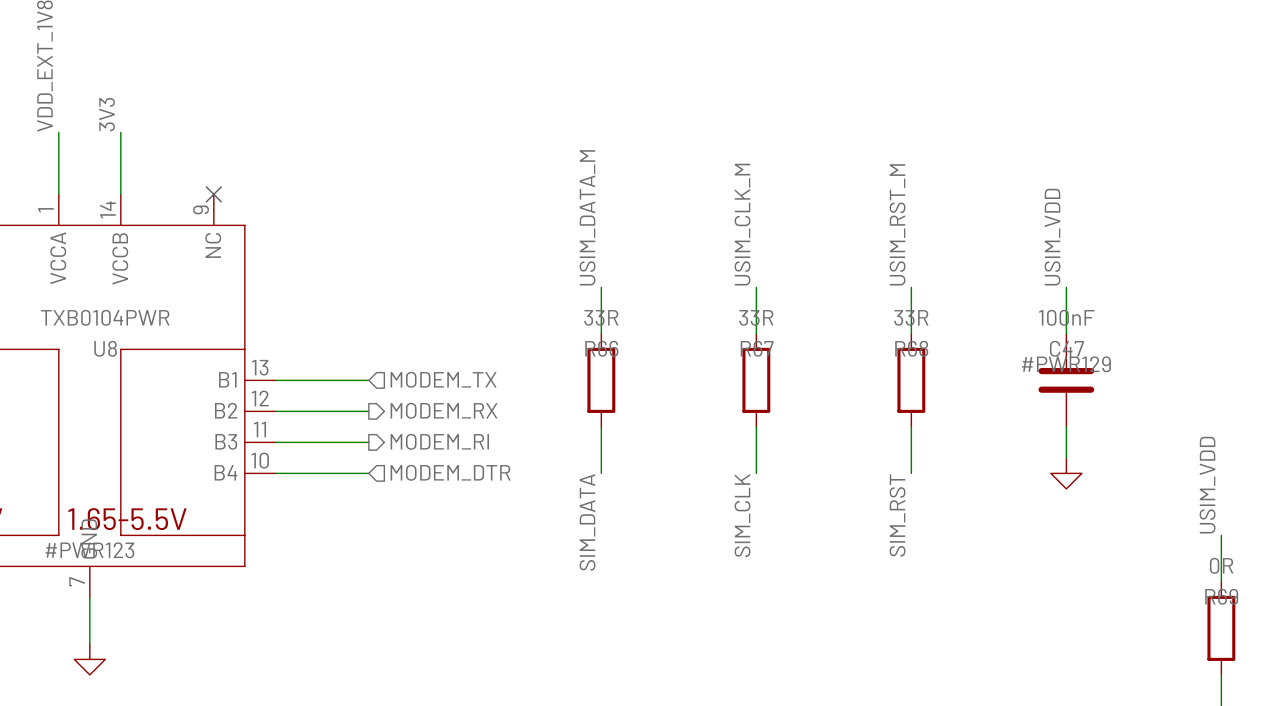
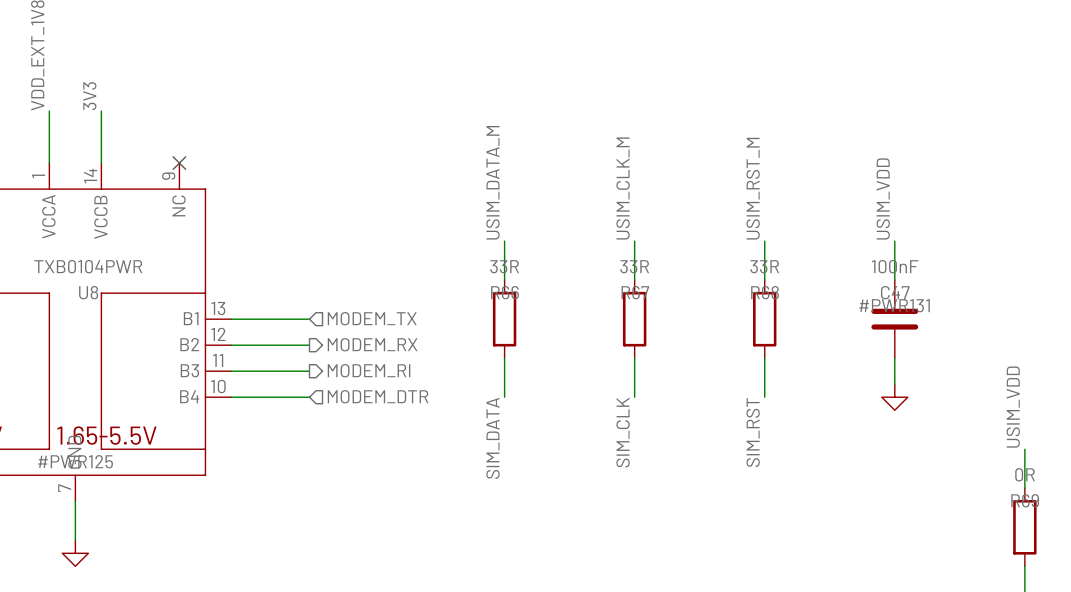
#PWR129 name: #PWR129 (1066, 364) -> #PWR131 (894, 305)
#PWR123 name: #PWR123 (89, 550) -> #PWR125 (75, 461)

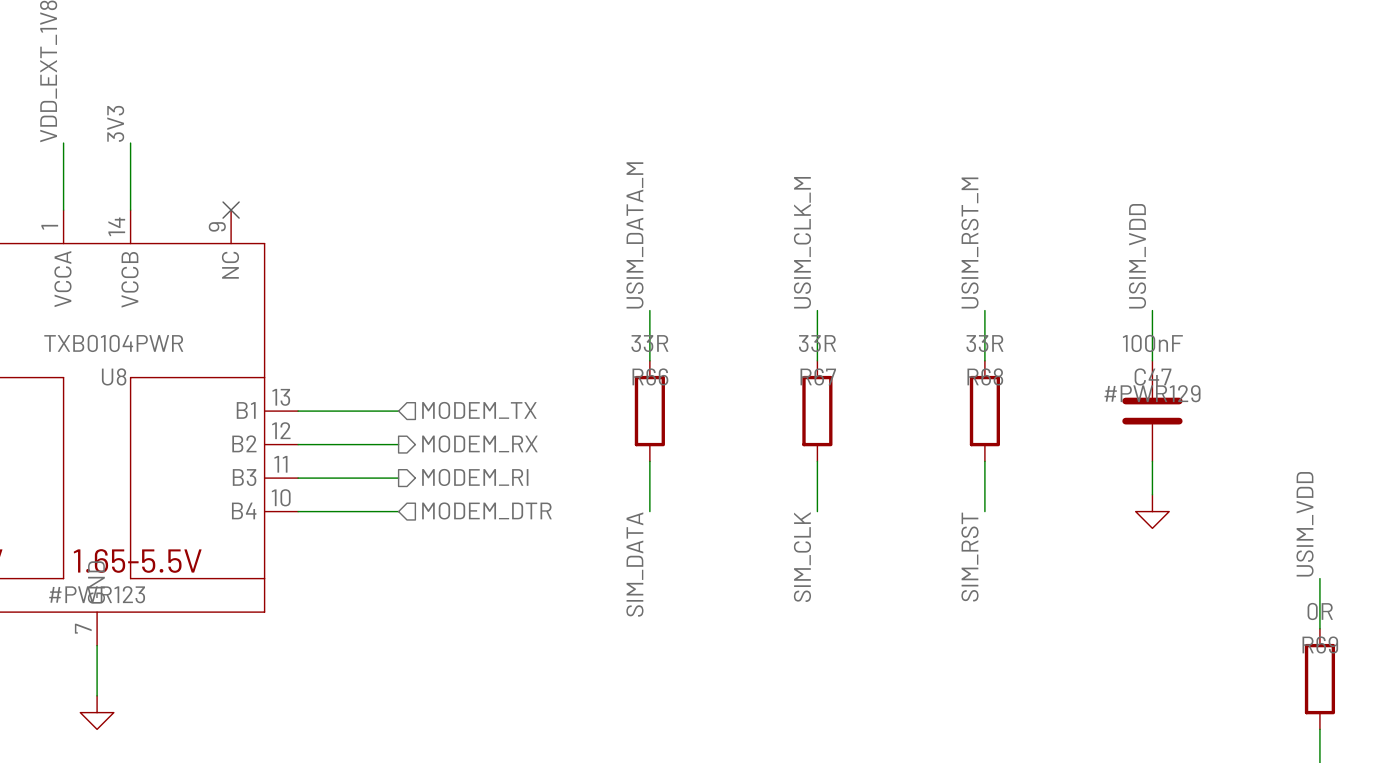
#PWR131 name: #PWR131 (894, 305) -> #PWR129 (1152, 393)
#PWR125 name: #PWR125 (75, 461) -> #PWR123 (97, 594)

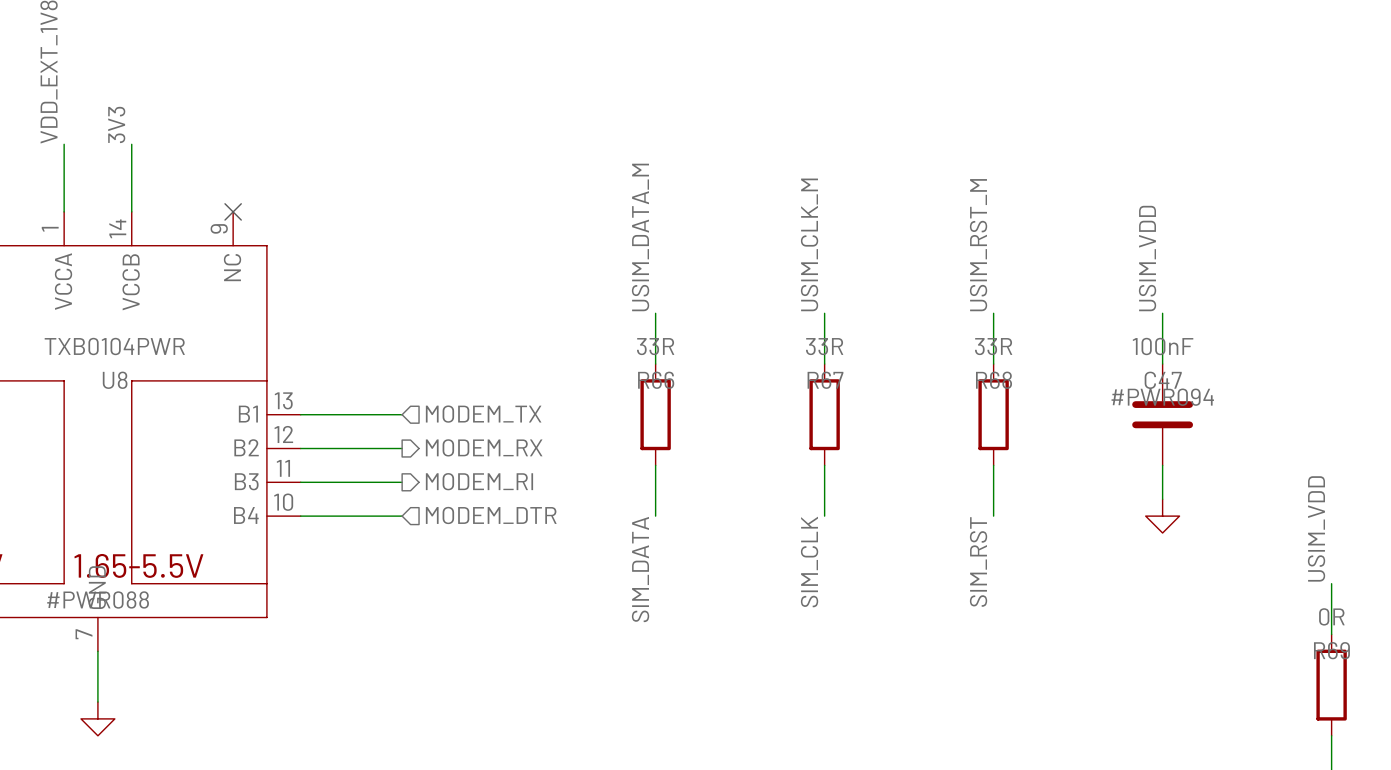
#PWR129 name: #PWR129 (1152, 393) -> #PWR094 (1162, 397)
#PWR123 name: #PWR123 (97, 594) -> #PWR088 (98, 599)

